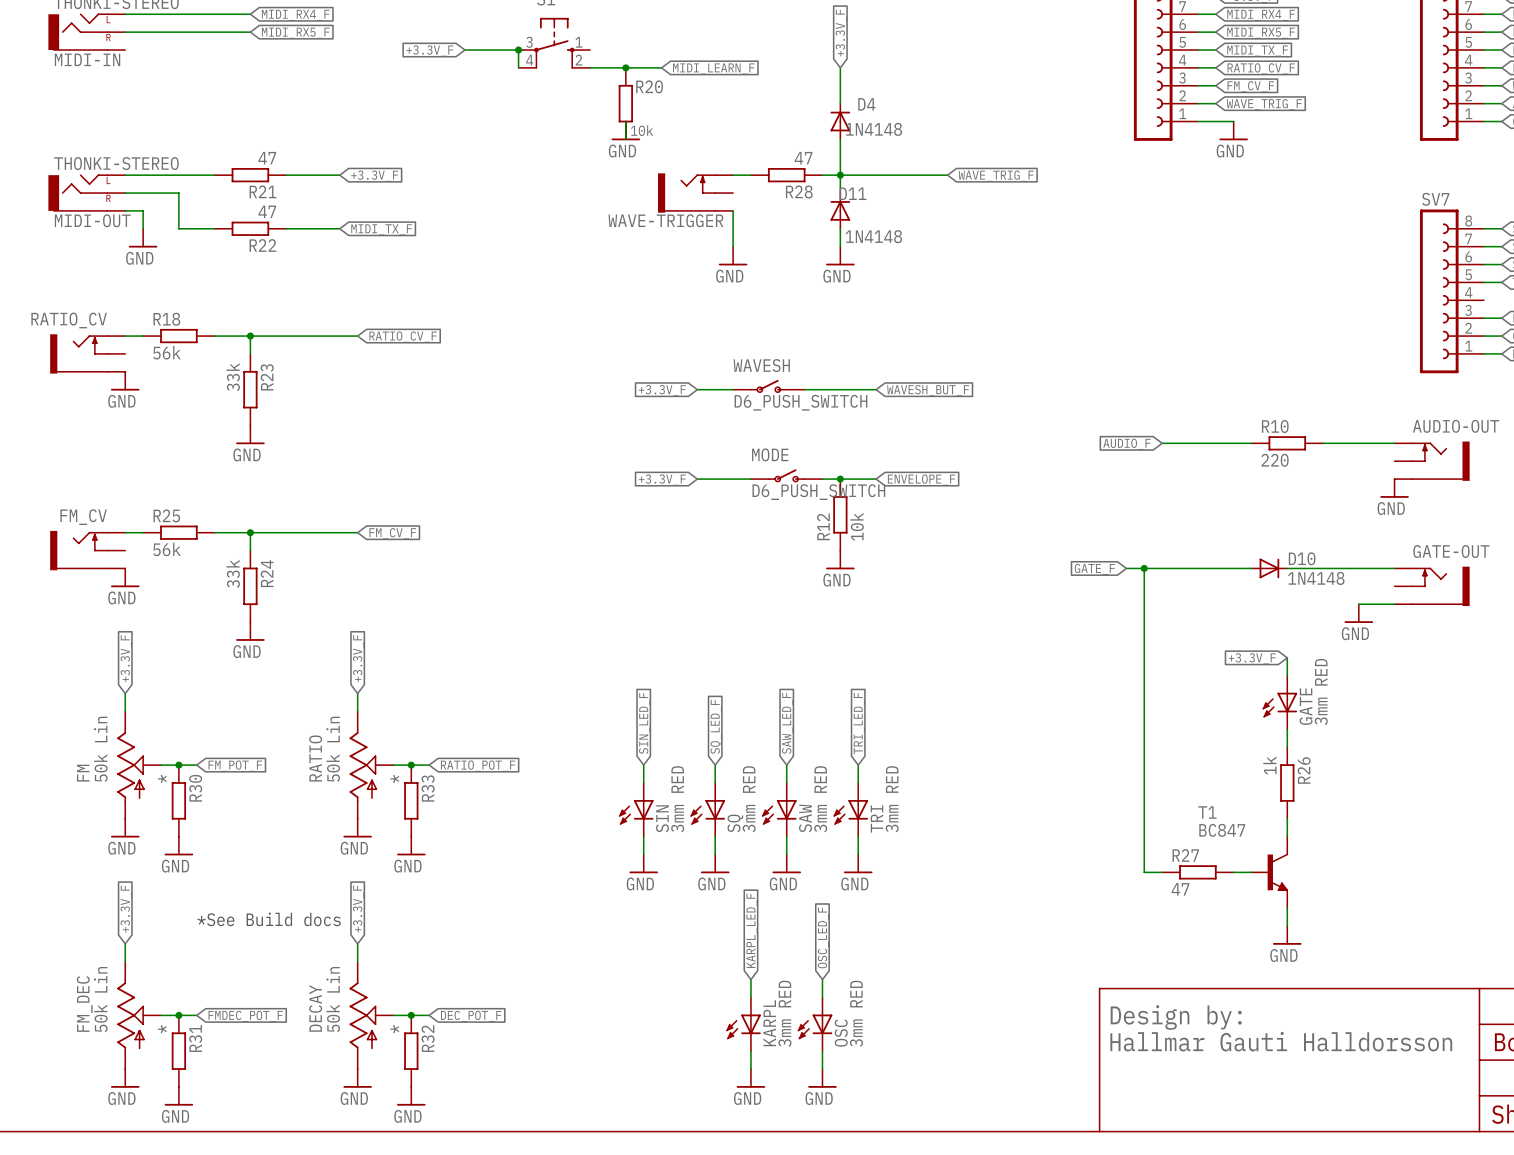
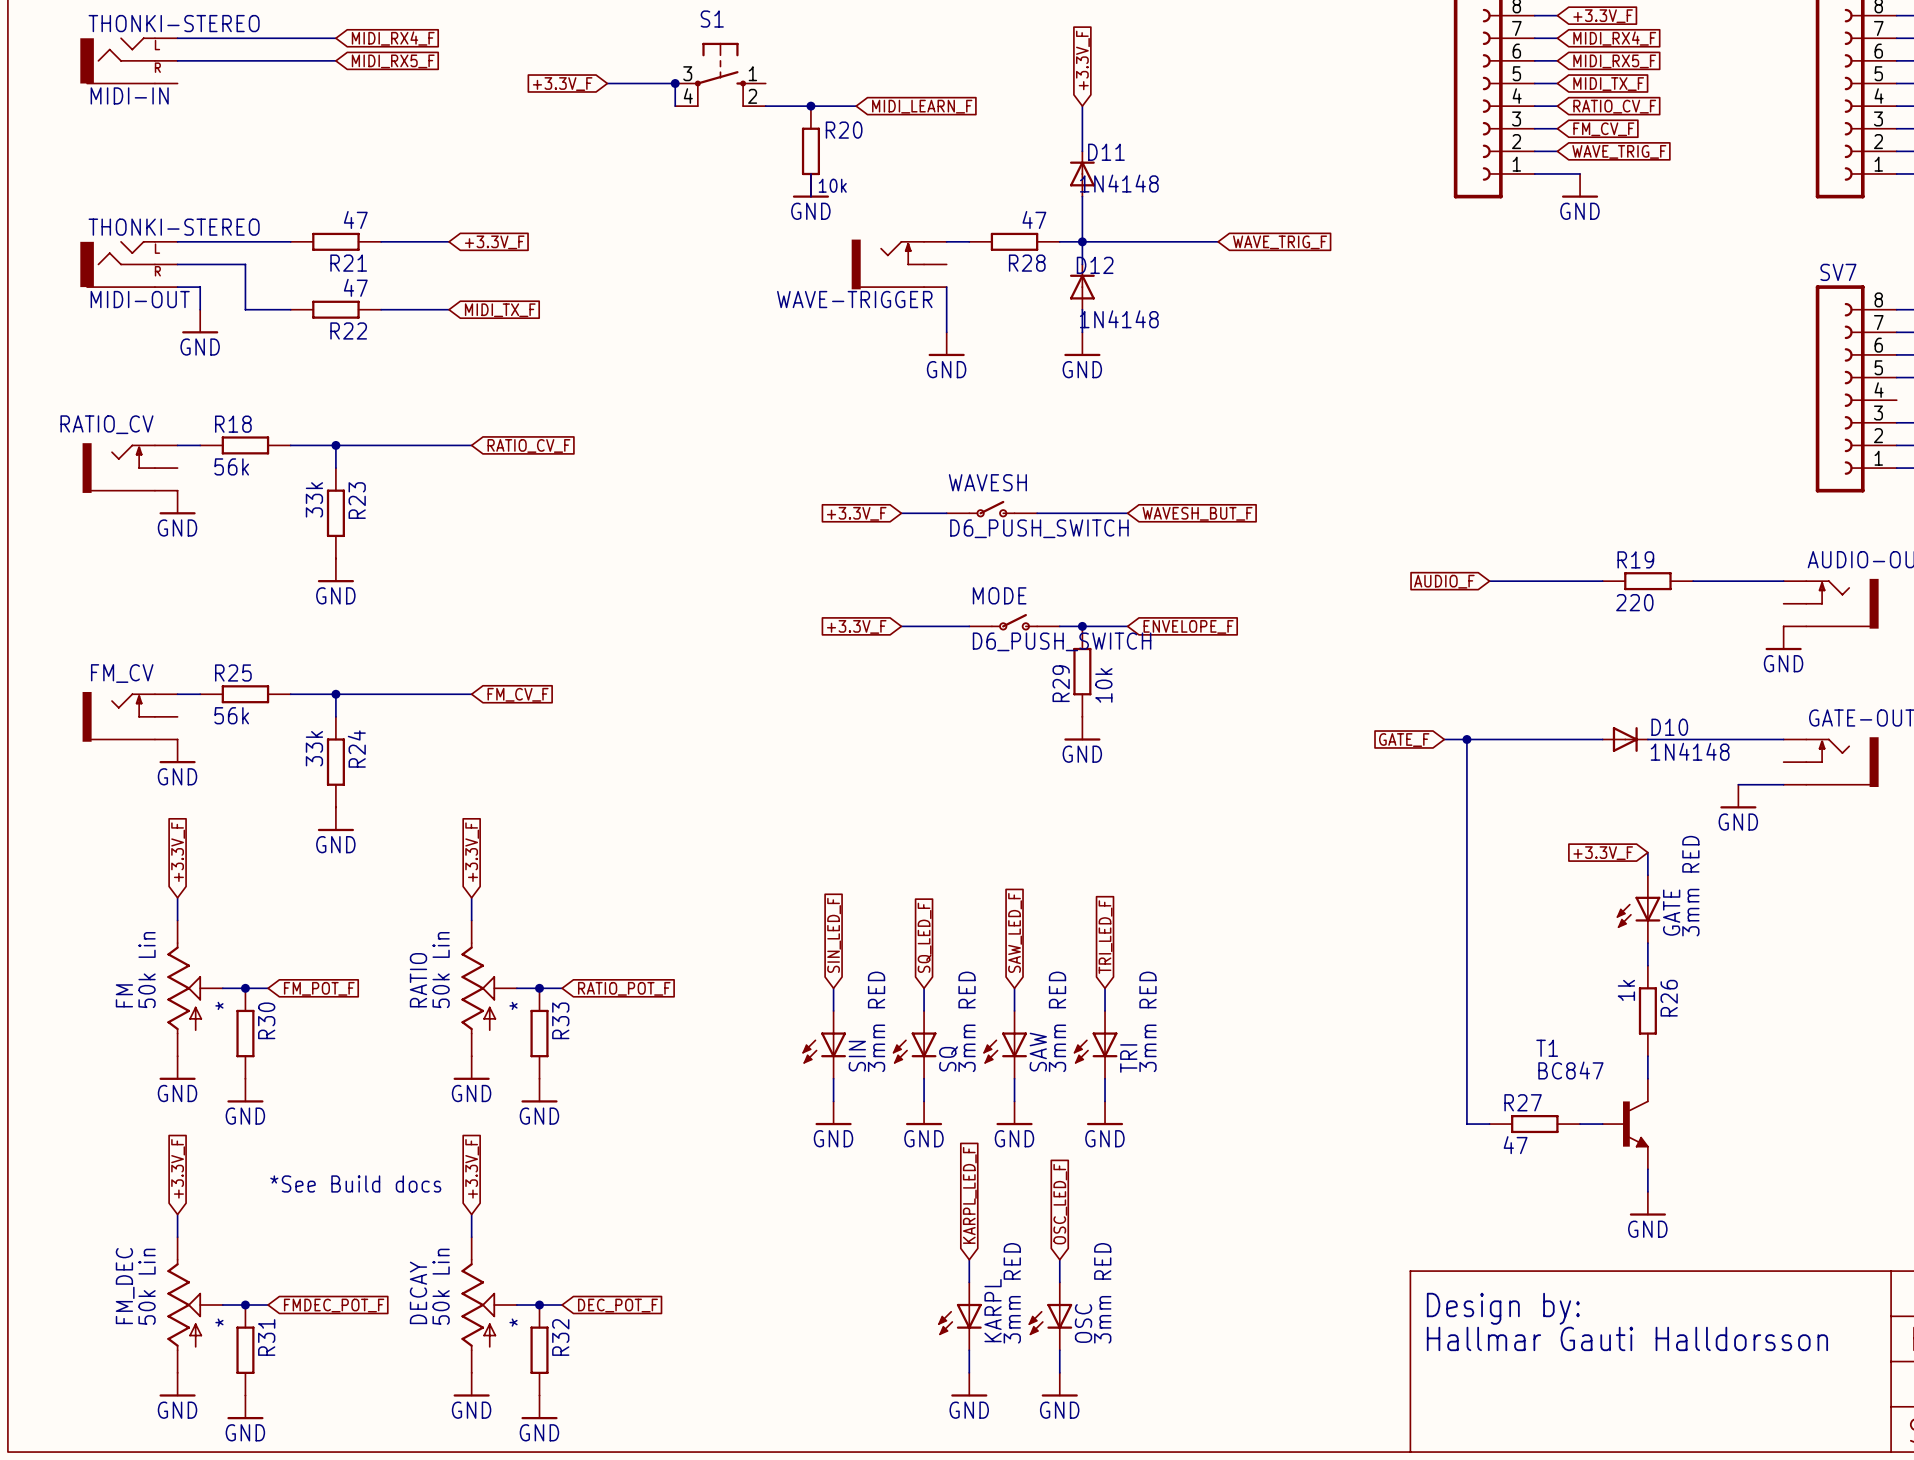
D4 name: D4 (866, 104) -> D11 (1106, 152)
D11 name: D11 (853, 193) -> D12 (1095, 265)
R10 name: R10 (1275, 426) -> R19 (1635, 559)
R12 name: R12 (823, 526) -> R29 (1061, 683)

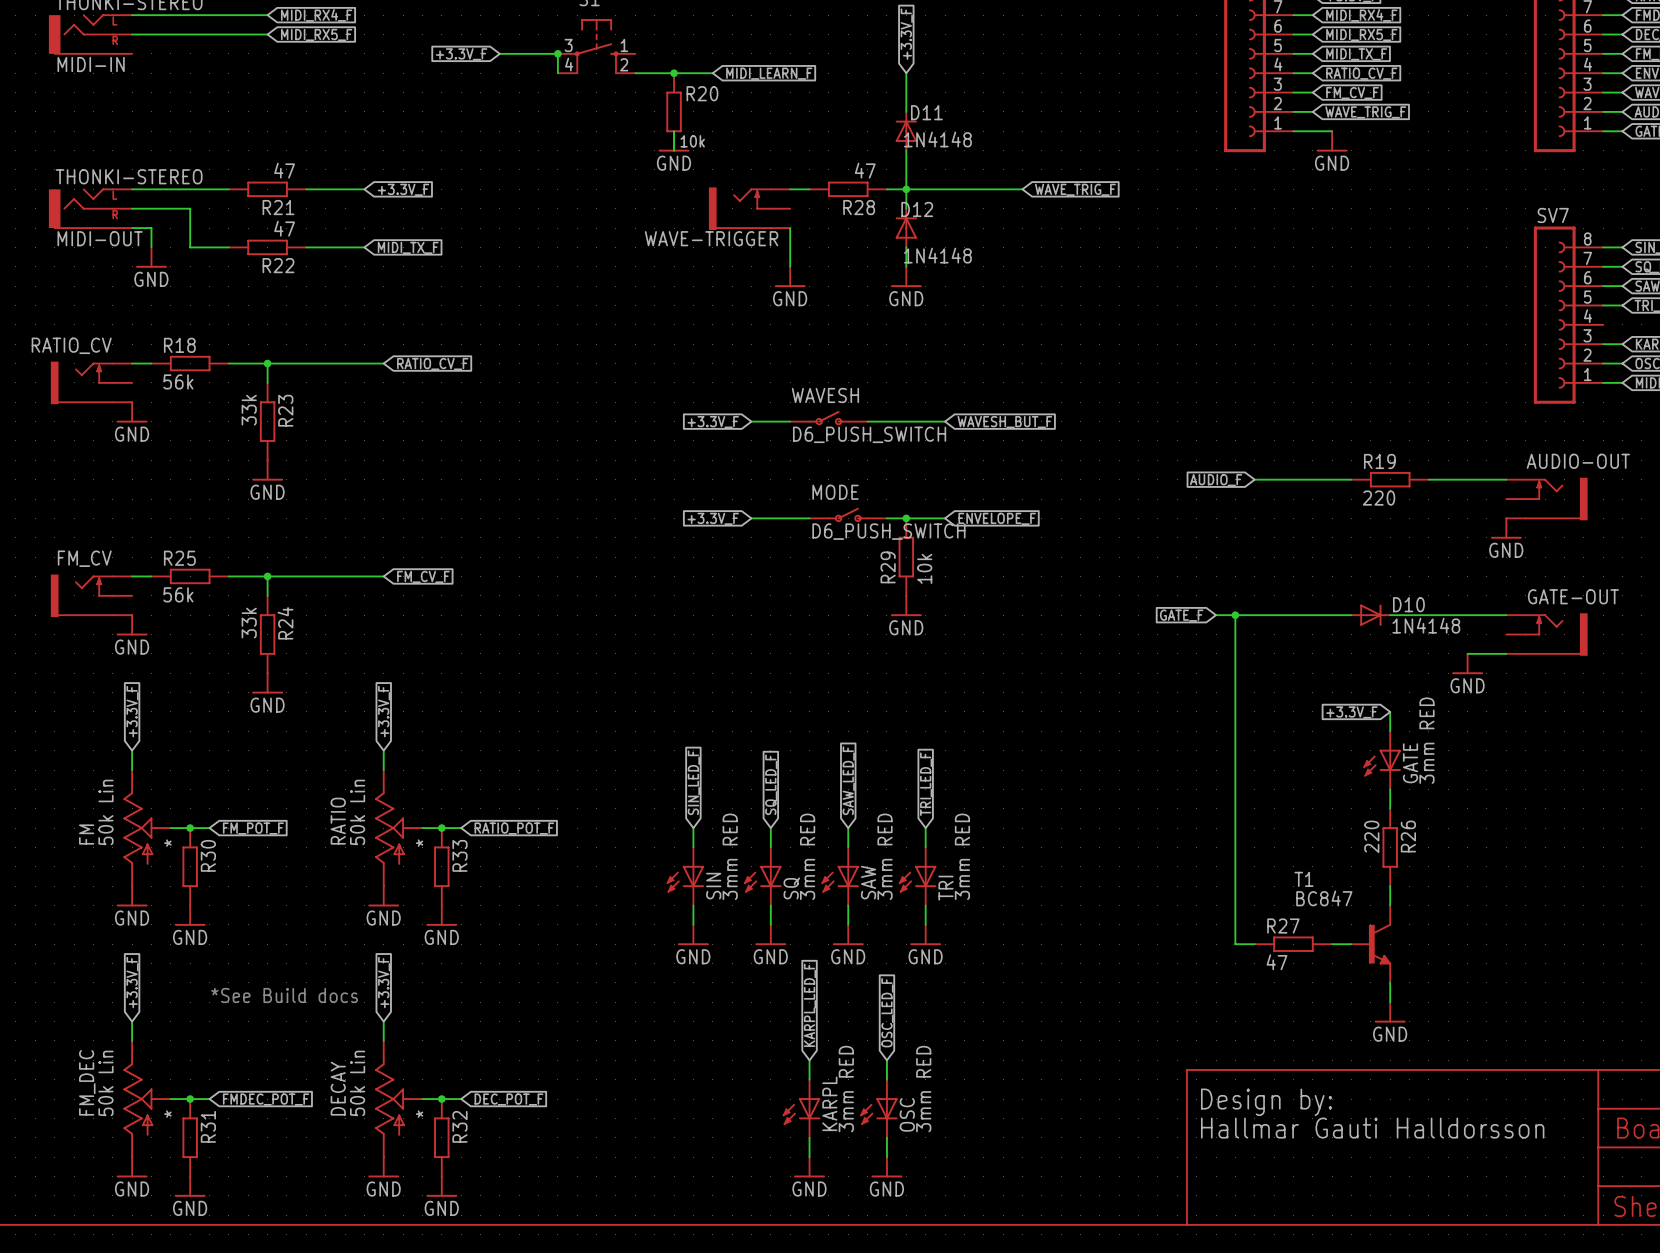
R26 value: 1k (1626, 990) -> 220 (1371, 836)

